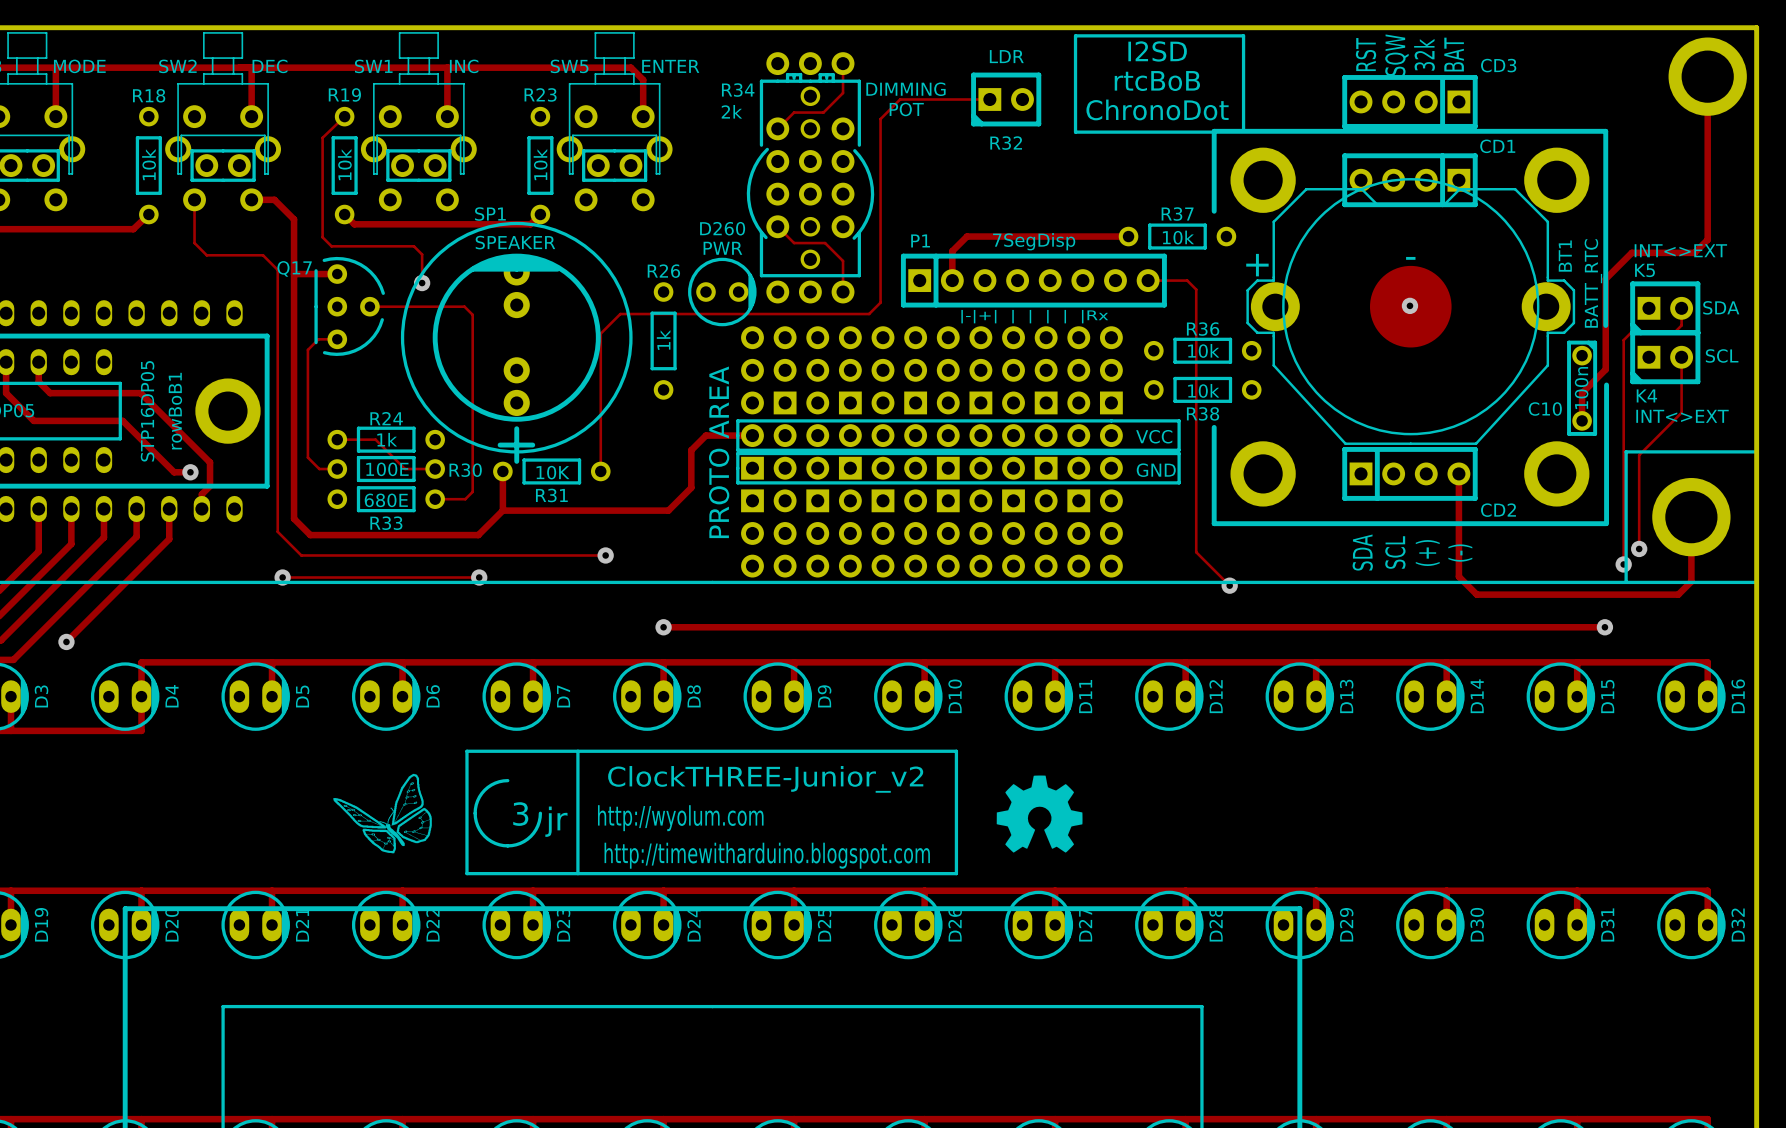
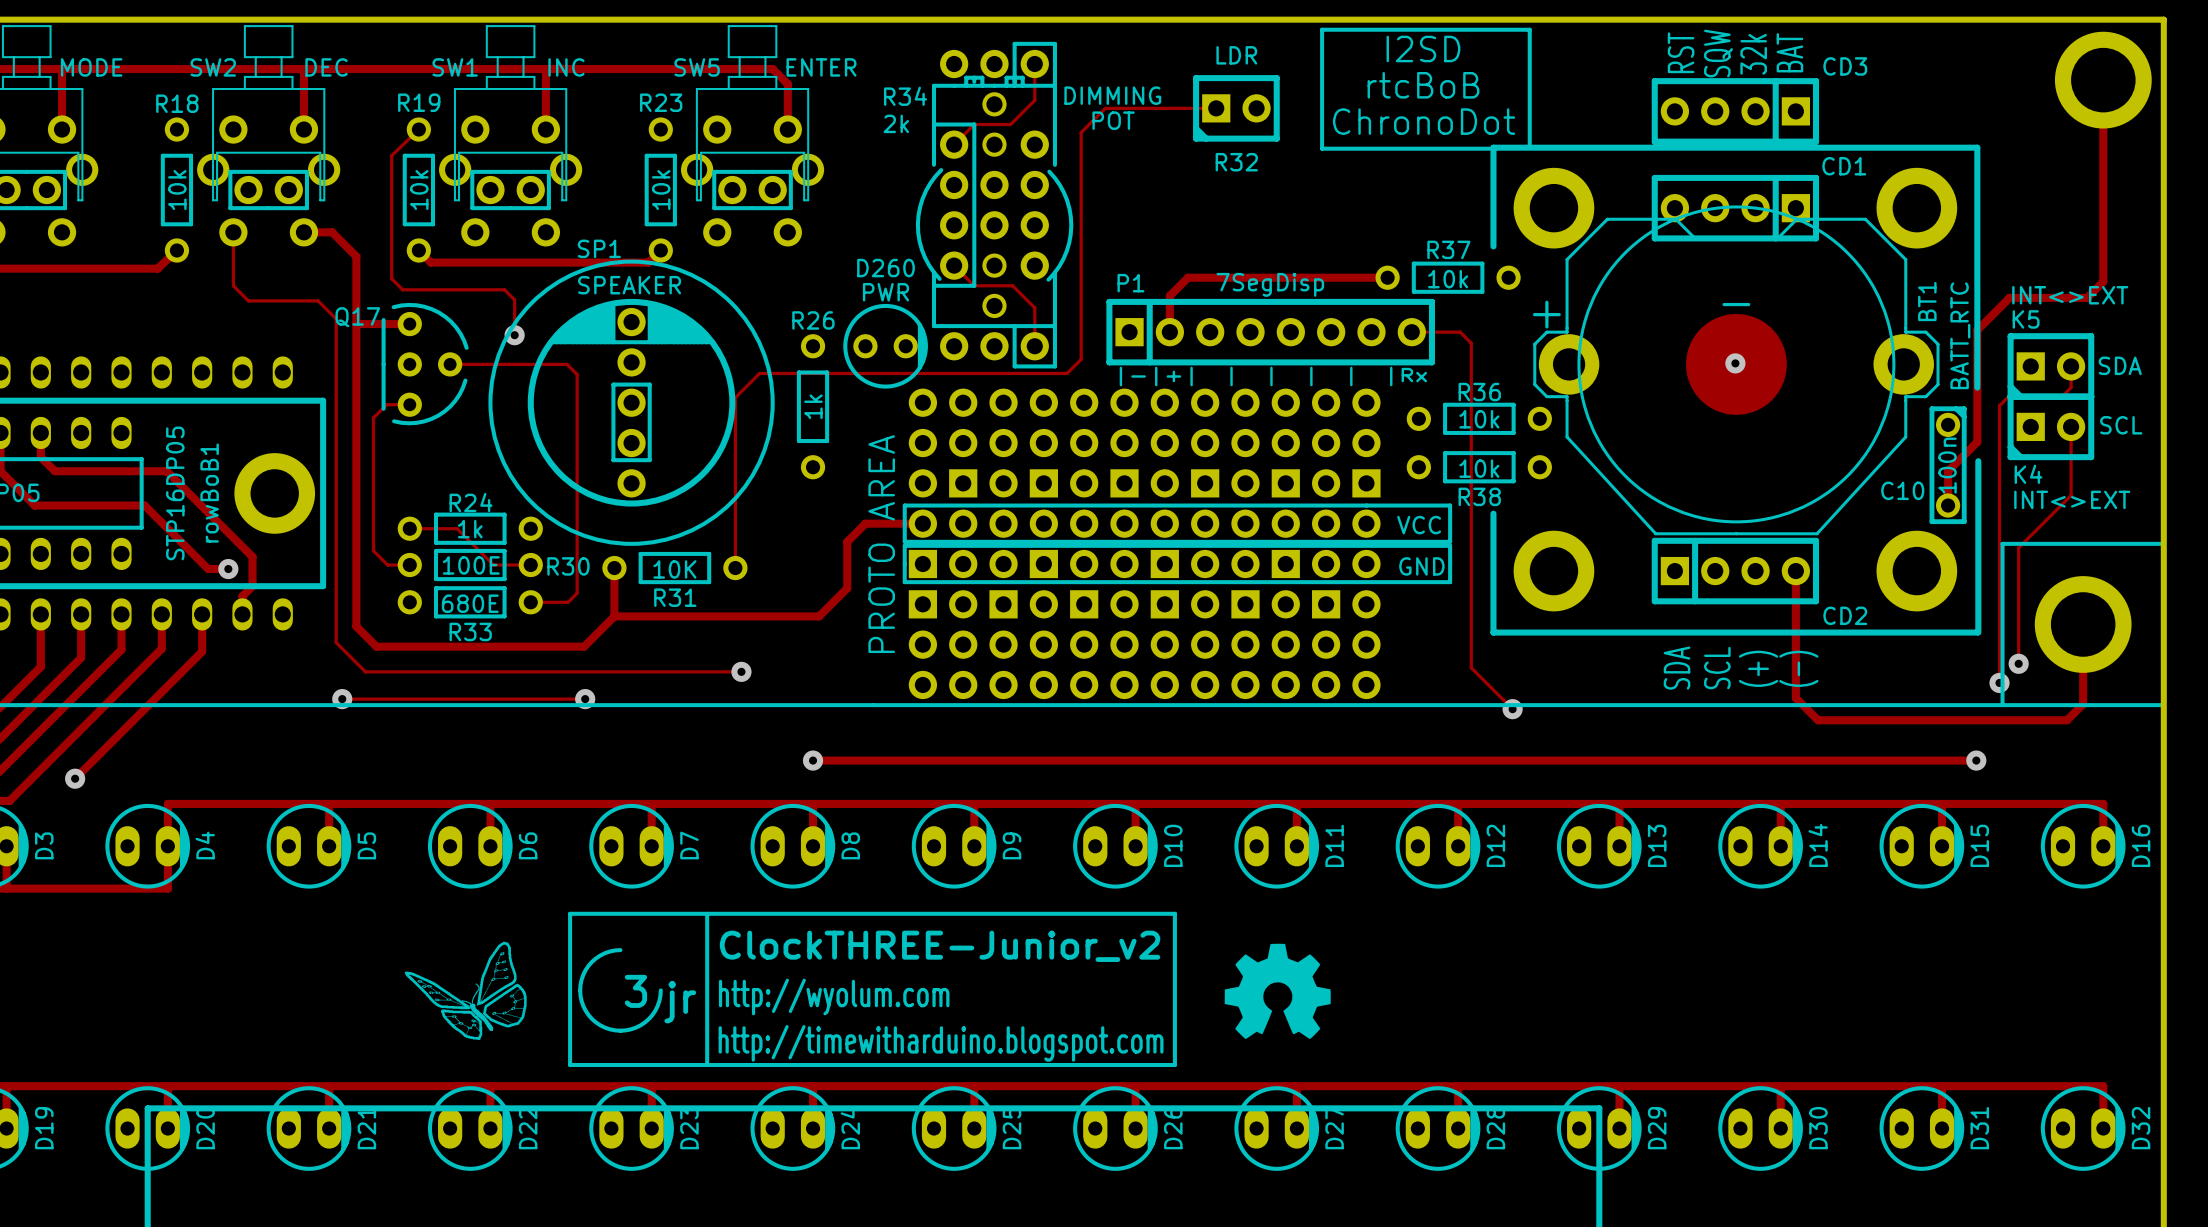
line: none -> (1014, 85) (1014, 43) (1054, 43) (1054, 86)
line: none -> (933, 124) (974, 124) (974, 285) (933, 285)
SP1 footprint: [432, 253, 601, 464] -> [527, 298, 736, 507]
line: none -> (1014, 326) (1014, 366) (1054, 366) (1054, 326)
line: none -> (613, 384) (649, 384) (649, 460) (613, 460) (613, 384)

